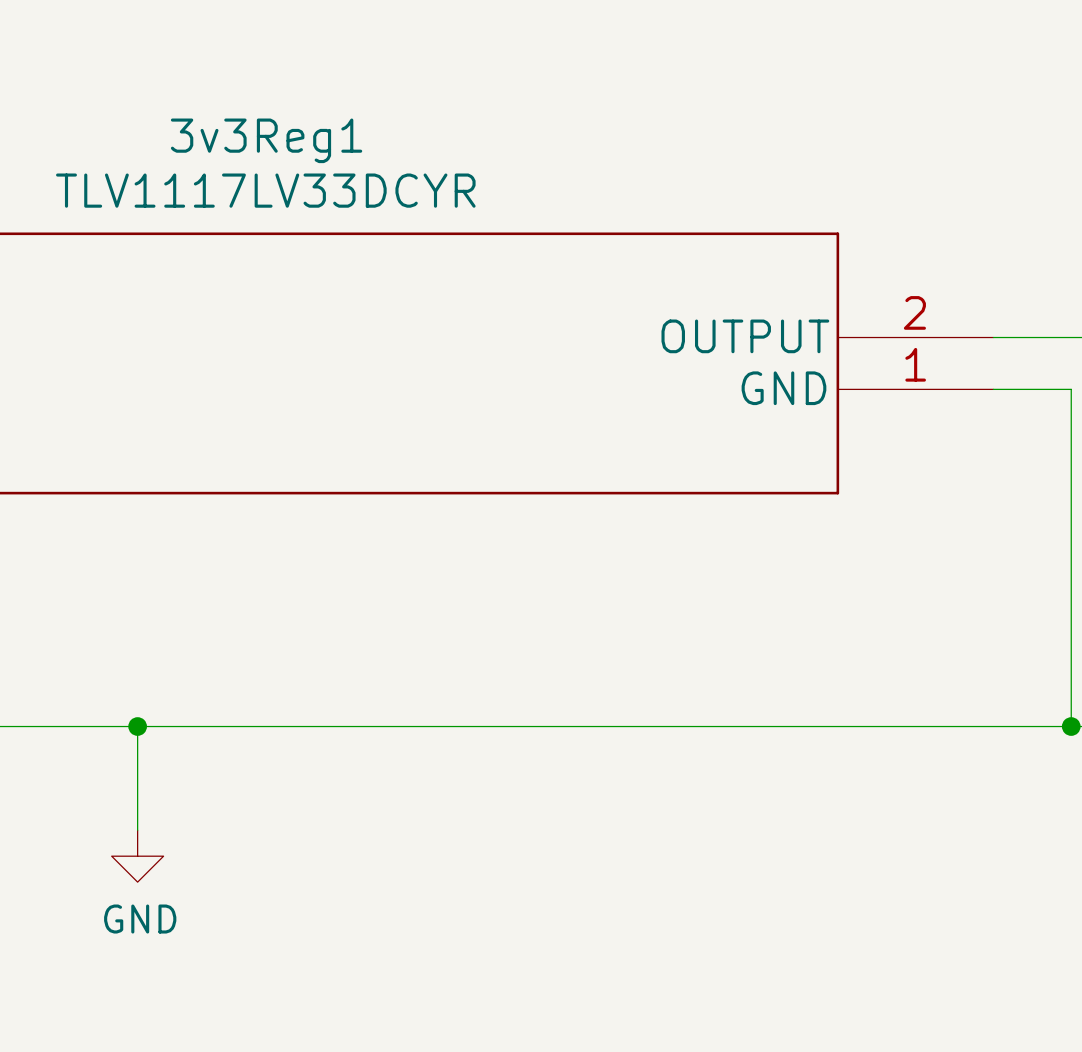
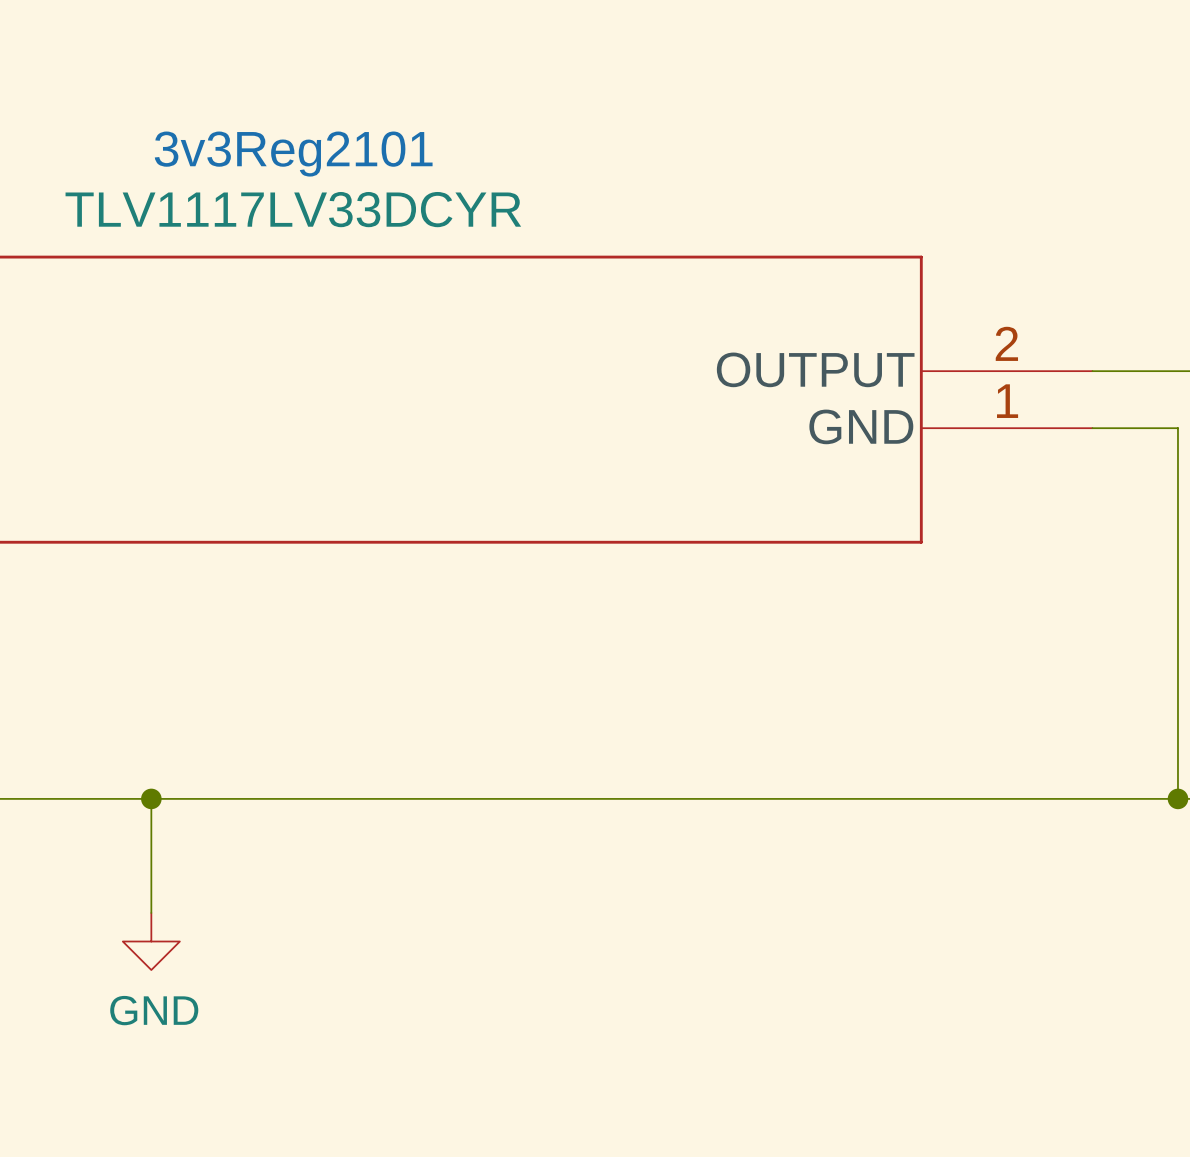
3v3Reg1 name: 3v3Reg1 (266, 140) -> 3v3Reg2101 (293, 154)

